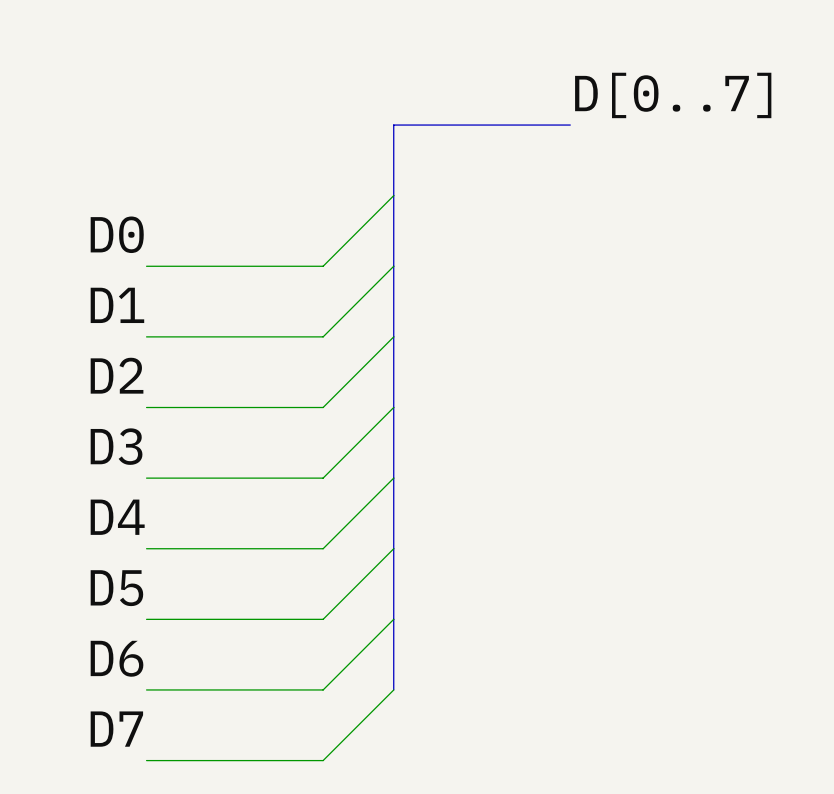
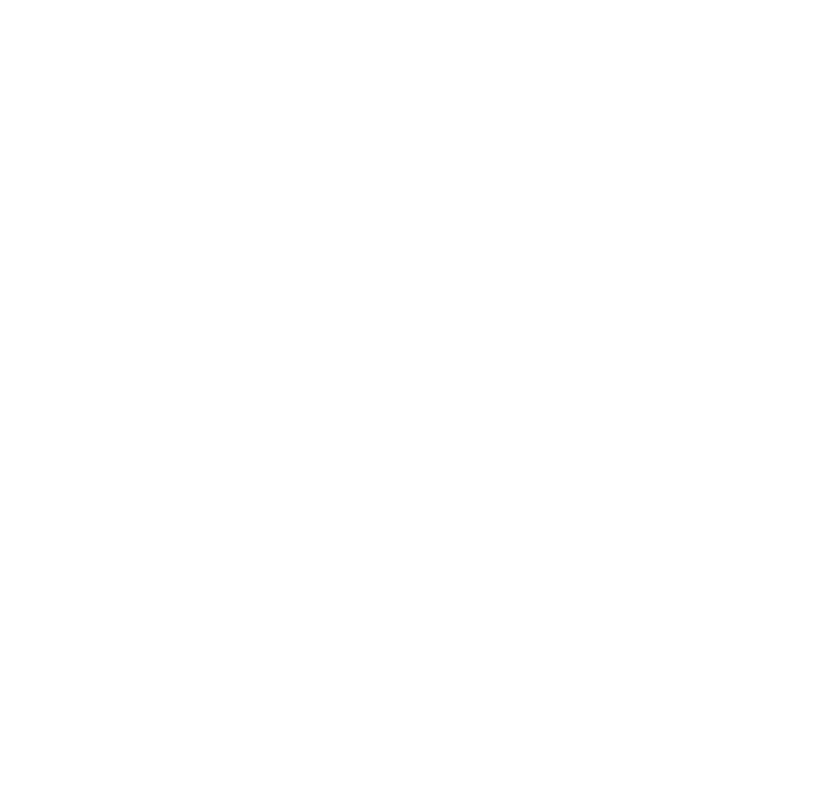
label: D[0..7] (673, 95) -> none
bus: (570, 125) (393, 125) (393, 689) -> none
wire: (393, 195) (323, 266) (146, 266) -> none
label: D0 (117, 234) -> none
wire: (393, 266) (323, 336) (146, 336) -> none
label: D1 (117, 305) -> none
wire: (393, 336) (323, 407) (146, 407) -> none
label: D2 (117, 375) -> none
wire: (393, 407) (323, 478) (146, 478) -> none
label: D3 (116, 446) -> none
wire: (393, 478) (323, 548) (146, 548) -> none
label: D4 (117, 517) -> none
wire: (393, 548) (323, 619) (146, 619) -> none
label: D5 (116, 588) -> none
wire: (393, 619) (323, 689) (146, 689) -> none
label: D6 (117, 658) -> none
wire: (393, 689) (323, 760) (146, 760) -> none
label: D7 (116, 729) -> none

